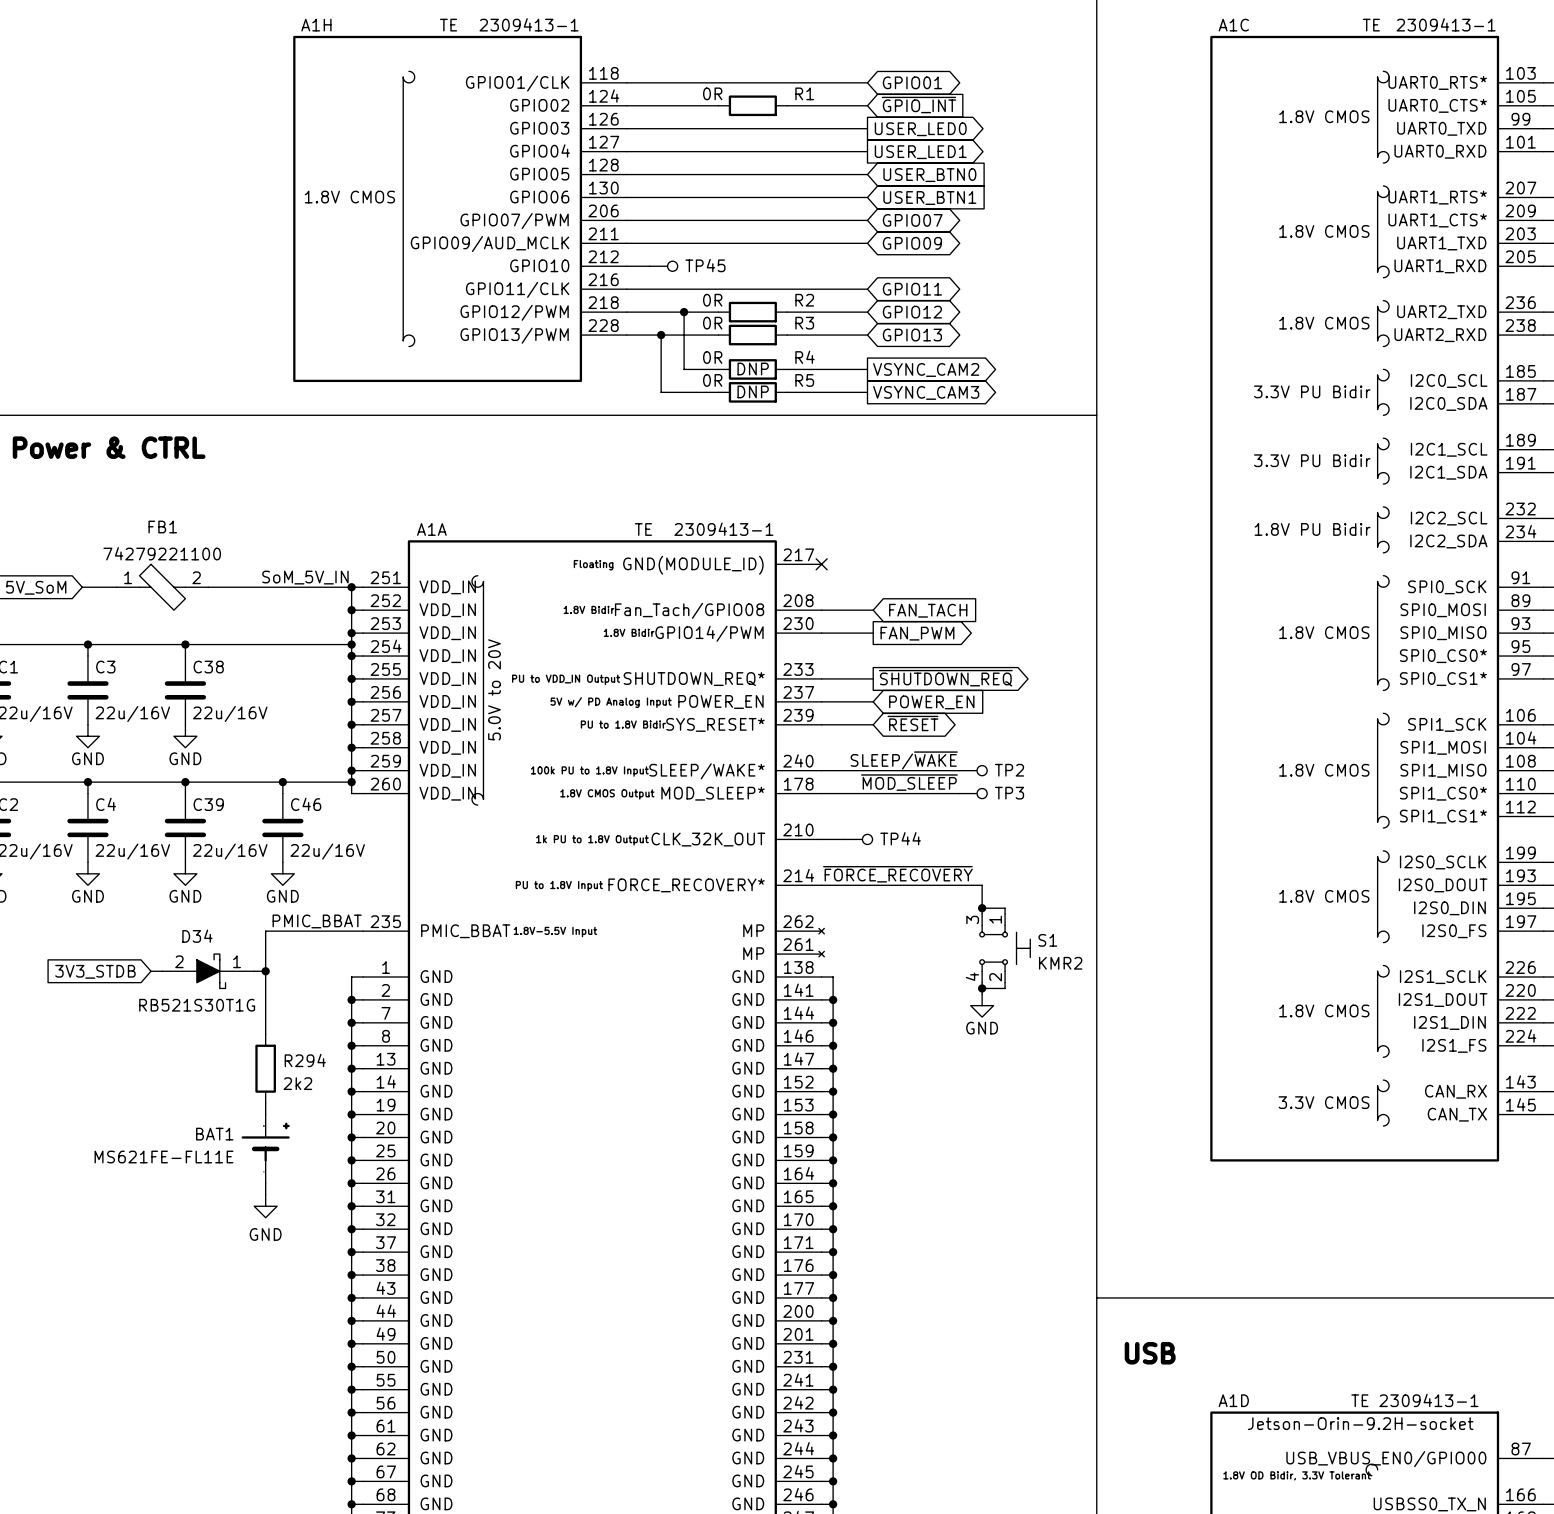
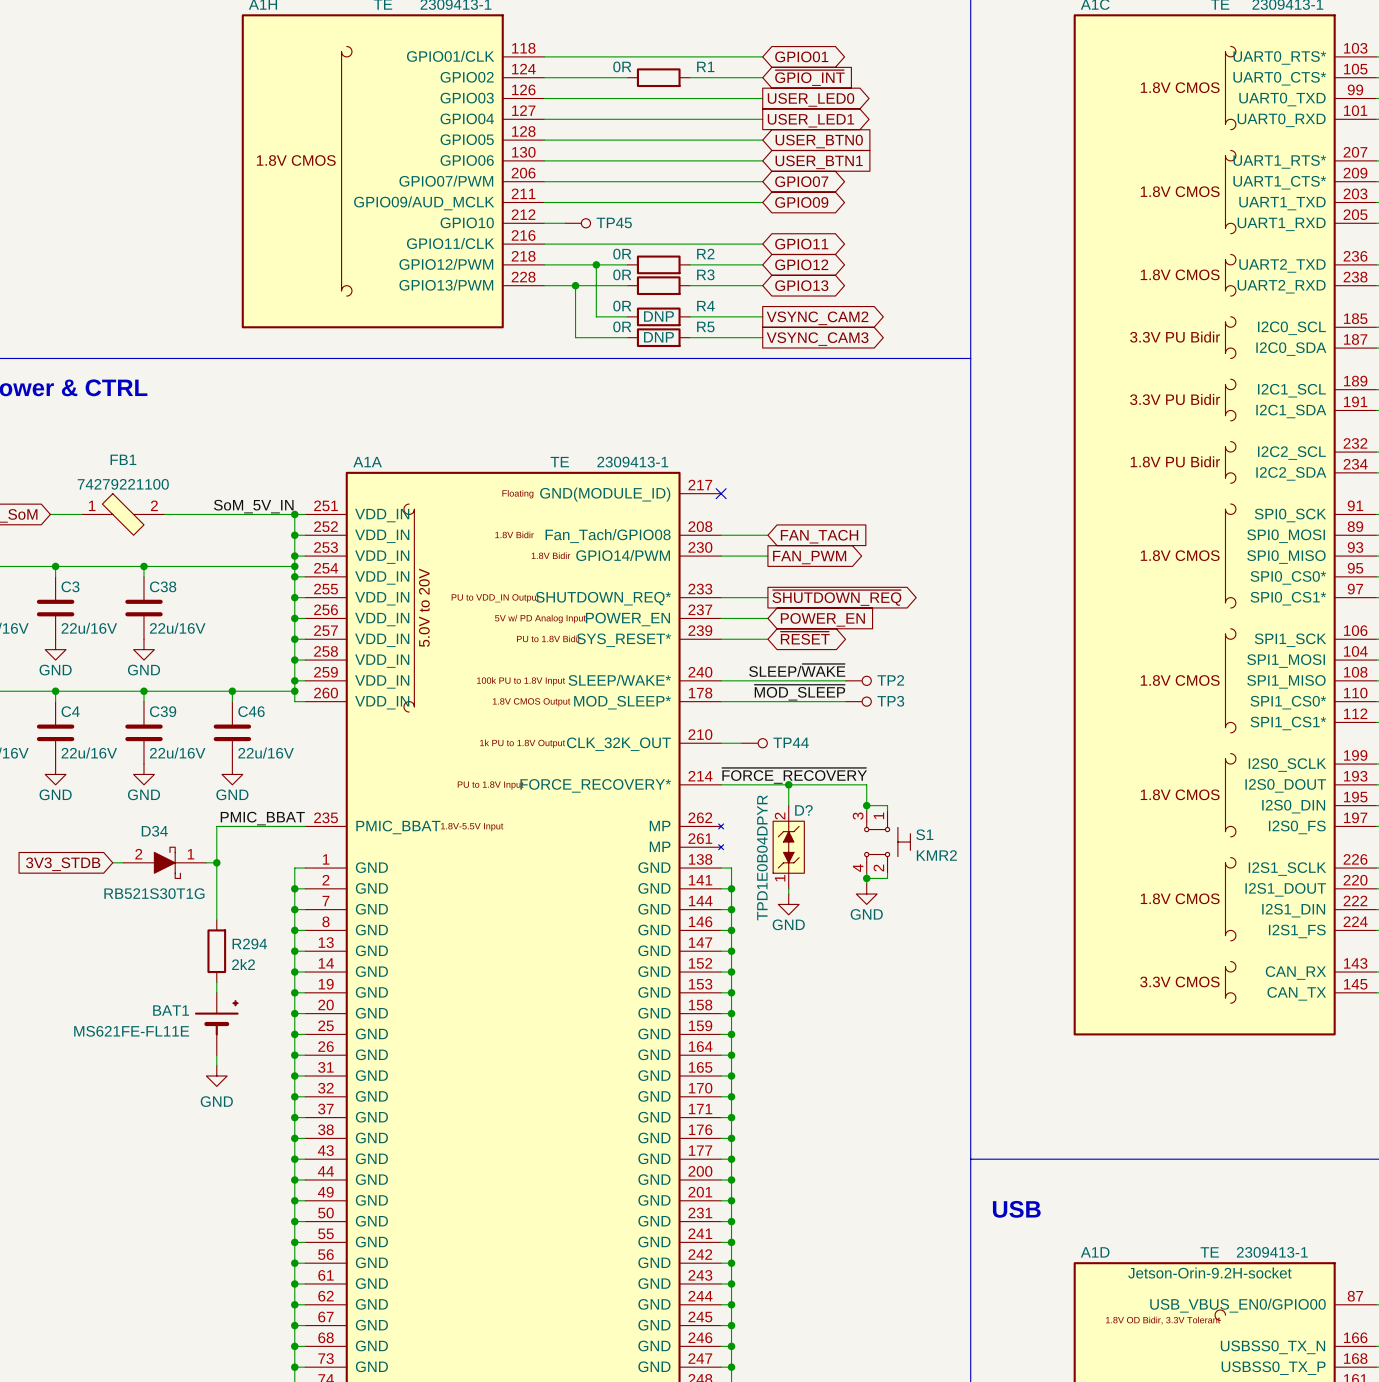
wire: none -> (788, 784) (788, 805)
junction: none -> (788, 784)
D?: none -> TPD1E0B04DPYR (788, 847)
wire: none -> (788, 888) (788, 894)
power symbol: none -> GND (788, 904)

